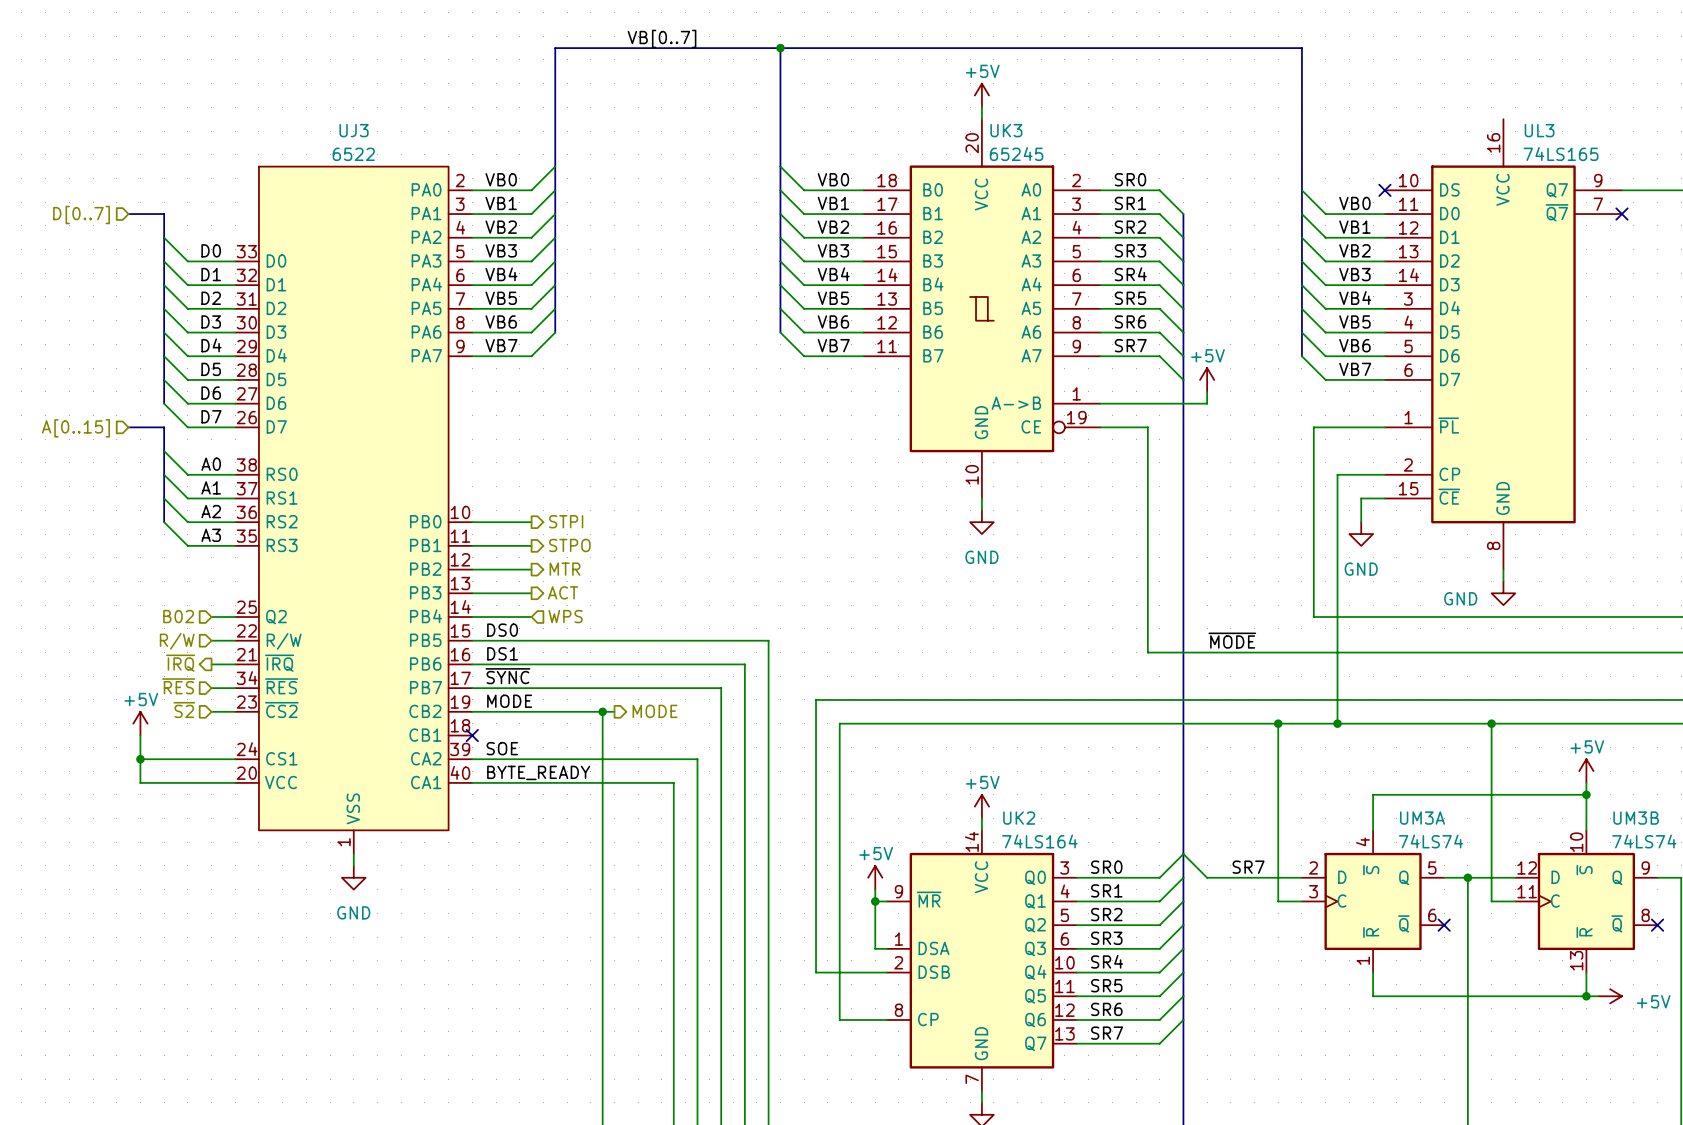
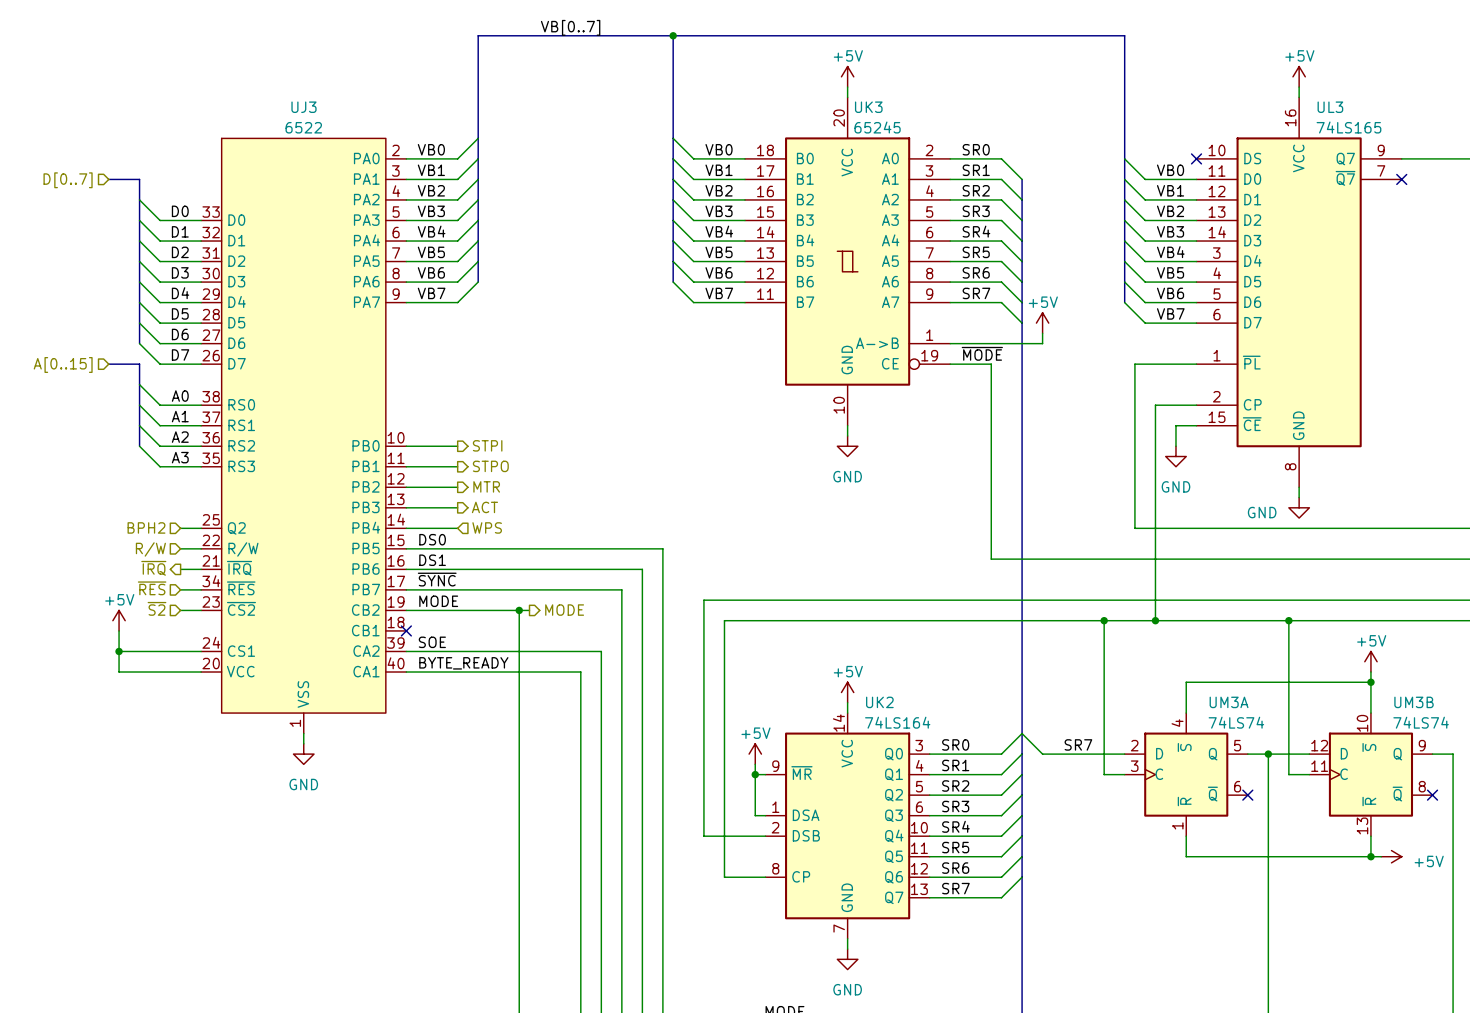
power symbol: none -> +5V (1299, 76)
wire: none -> (1299, 87) (1299, 97)
label: none -> ~{MODE} (982, 353)
hierarchical label: B02 (178, 616) -> BPH2 (146, 527)
label: ~{MODE} (1232, 640) -> none

